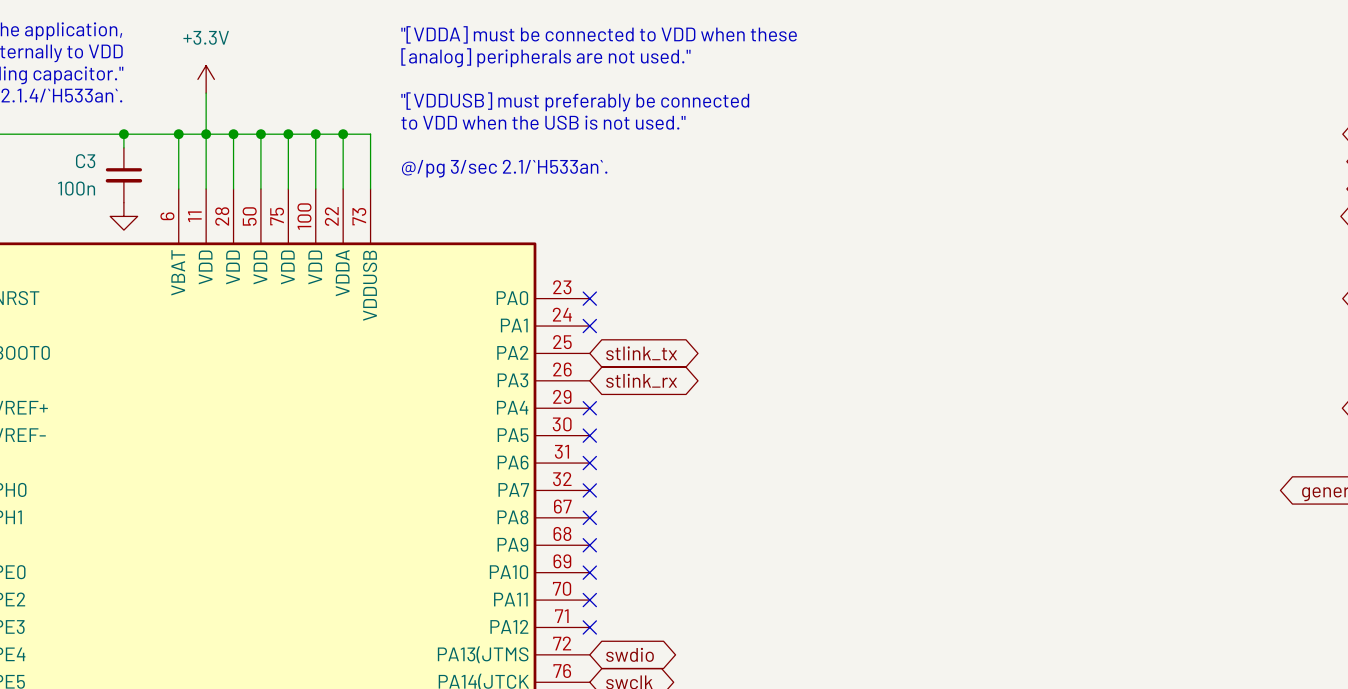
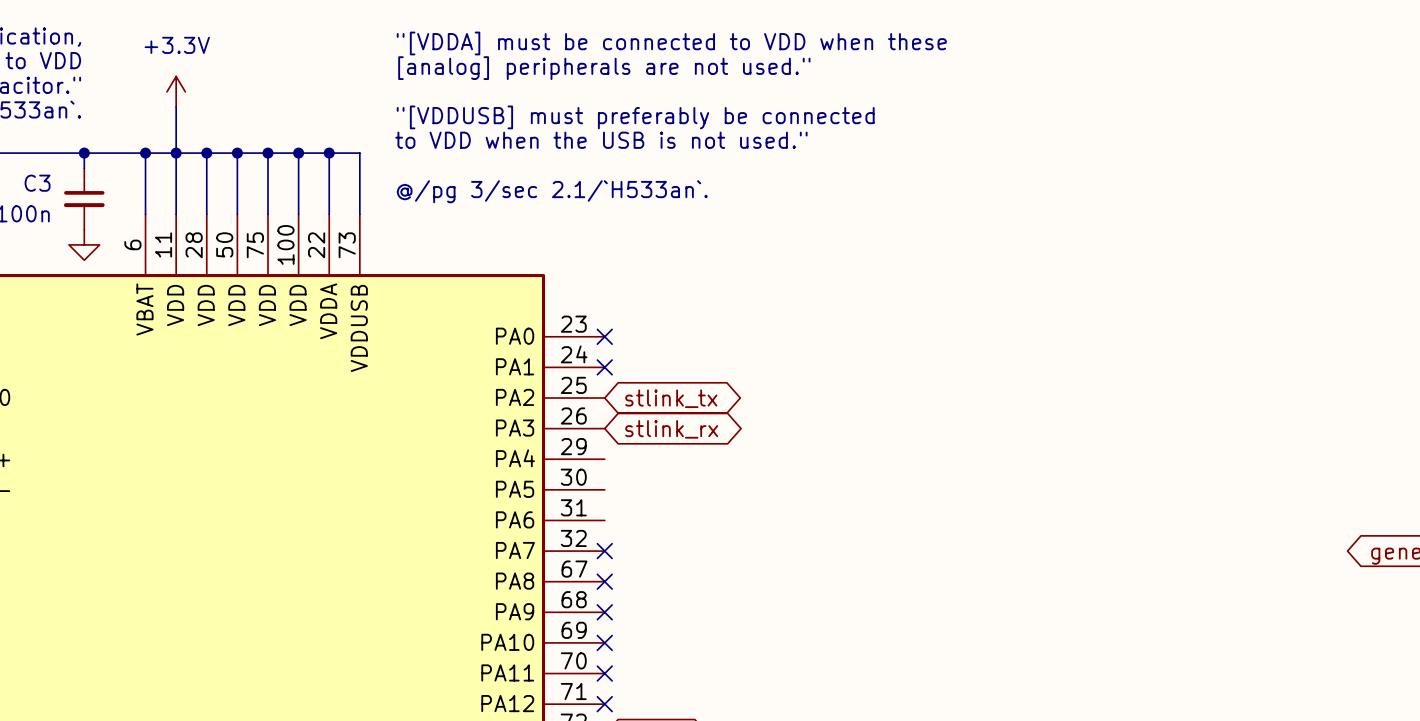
no-connect mark: (589, 408) -> none
no-connect mark: (589, 435) -> none
no-connect mark: (589, 463) -> none

